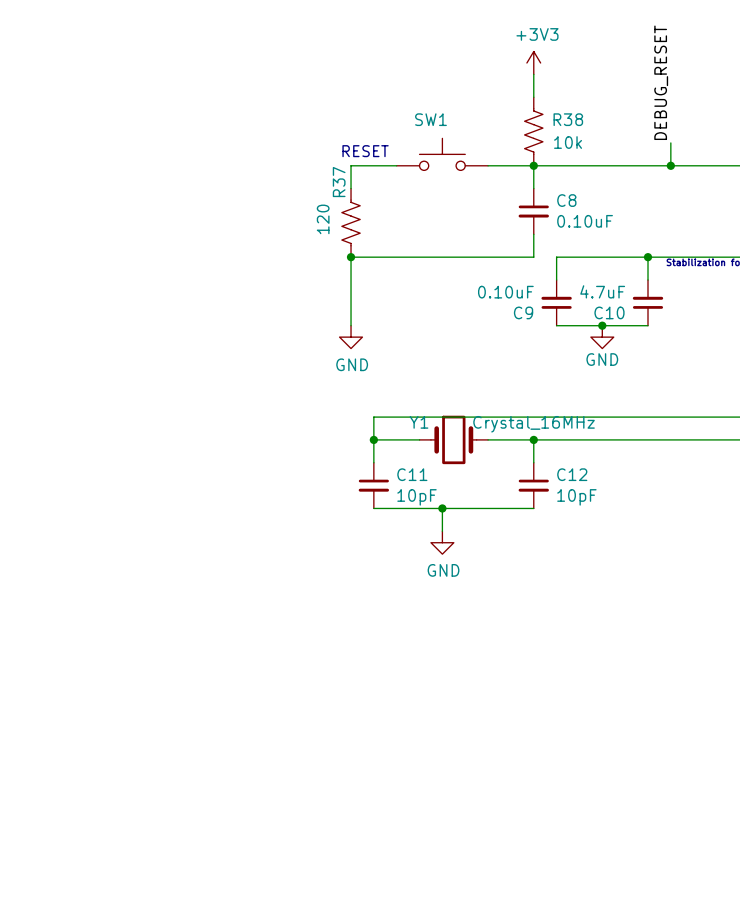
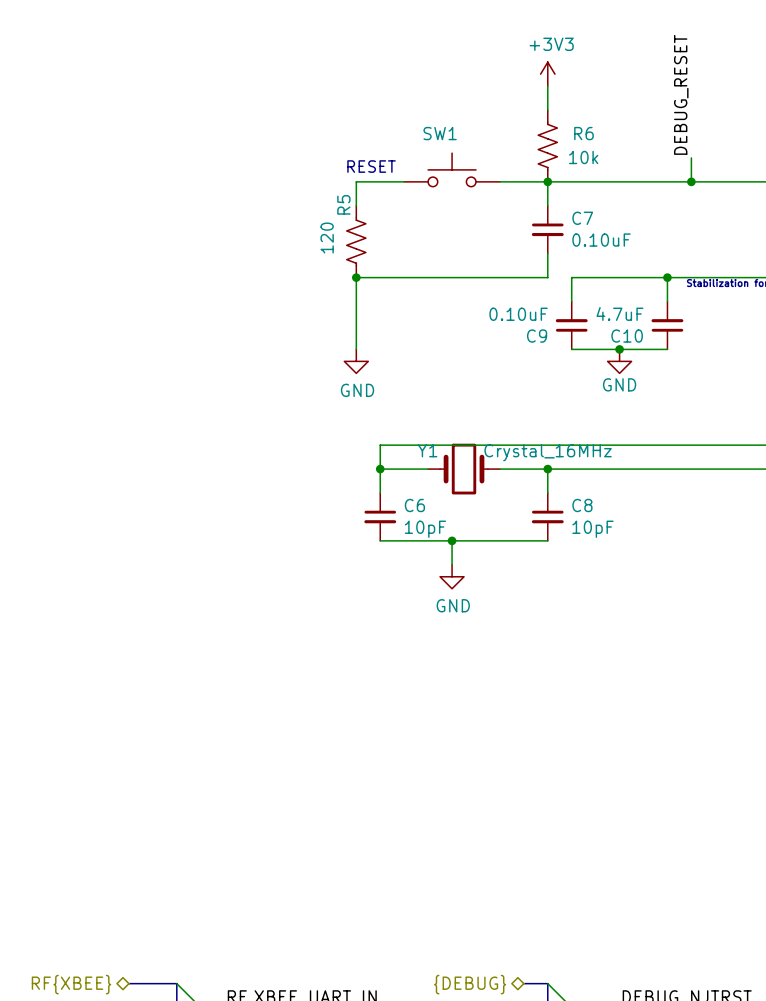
R38 name: R38 (568, 119) -> R6 (583, 133)
R37 name: R37 (339, 182) -> R5 (343, 204)
C8 name: C8 (566, 200) -> C7 (582, 218)
C11 name: C11 (412, 474) -> C6 (414, 505)
C12 name: C12 (572, 474) -> C8 (582, 505)

